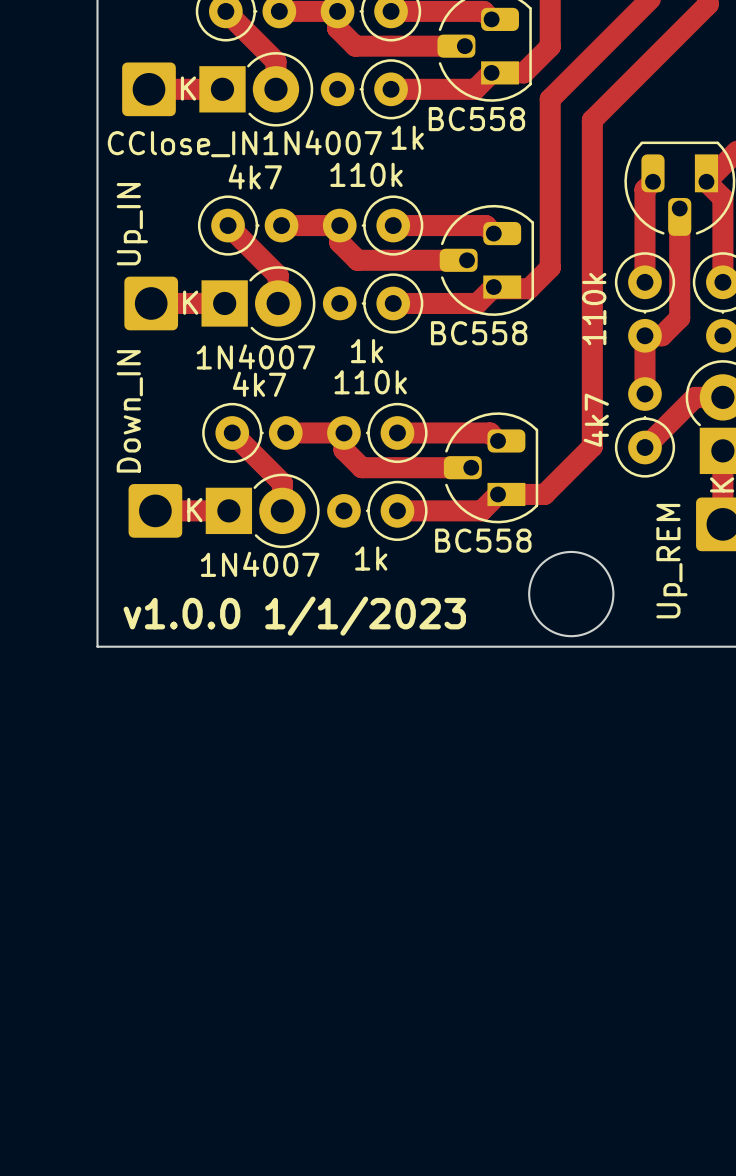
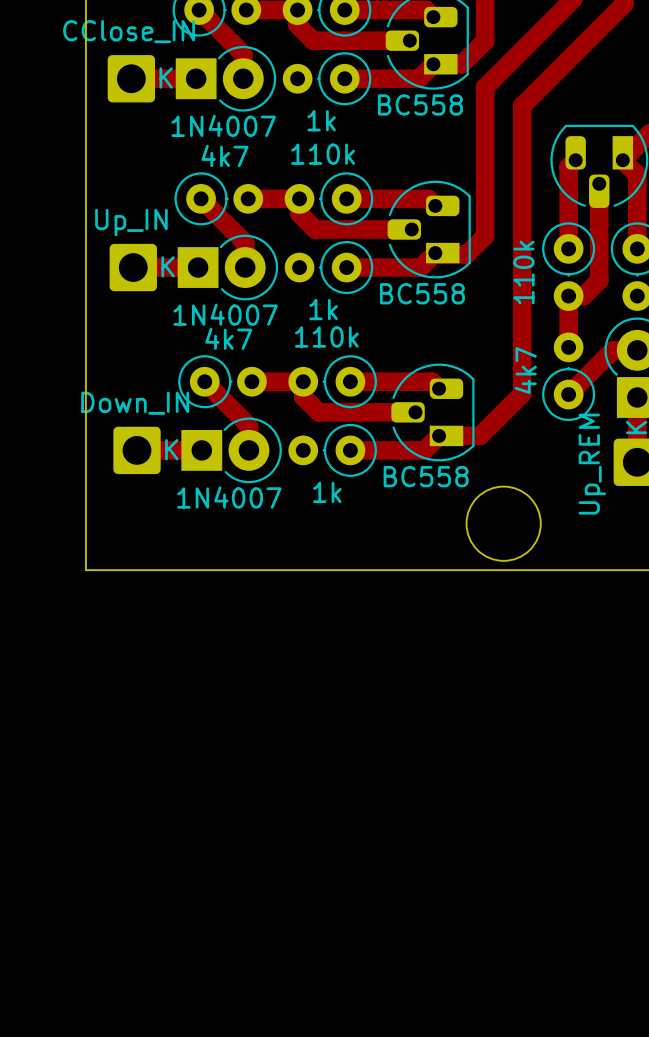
part value position: 1k (407, 137) -> 1k (321, 120)
part value position: 1N4007 (322, 142) -> 1N4007 (223, 125)
part value position: CClose_IN (182, 144) -> CClose_IN (129, 31)
part value rotation: 0° (132, 224) -> 90° clockwise (131, 222)
part value rotation: 0° (129, 411) -> 90° clockwise (135, 403)
part value position: Up_REM (671, 561) -> Up_REM (592, 464)
text: v1.0.0 1/1/2023 (294, 616) -> none

